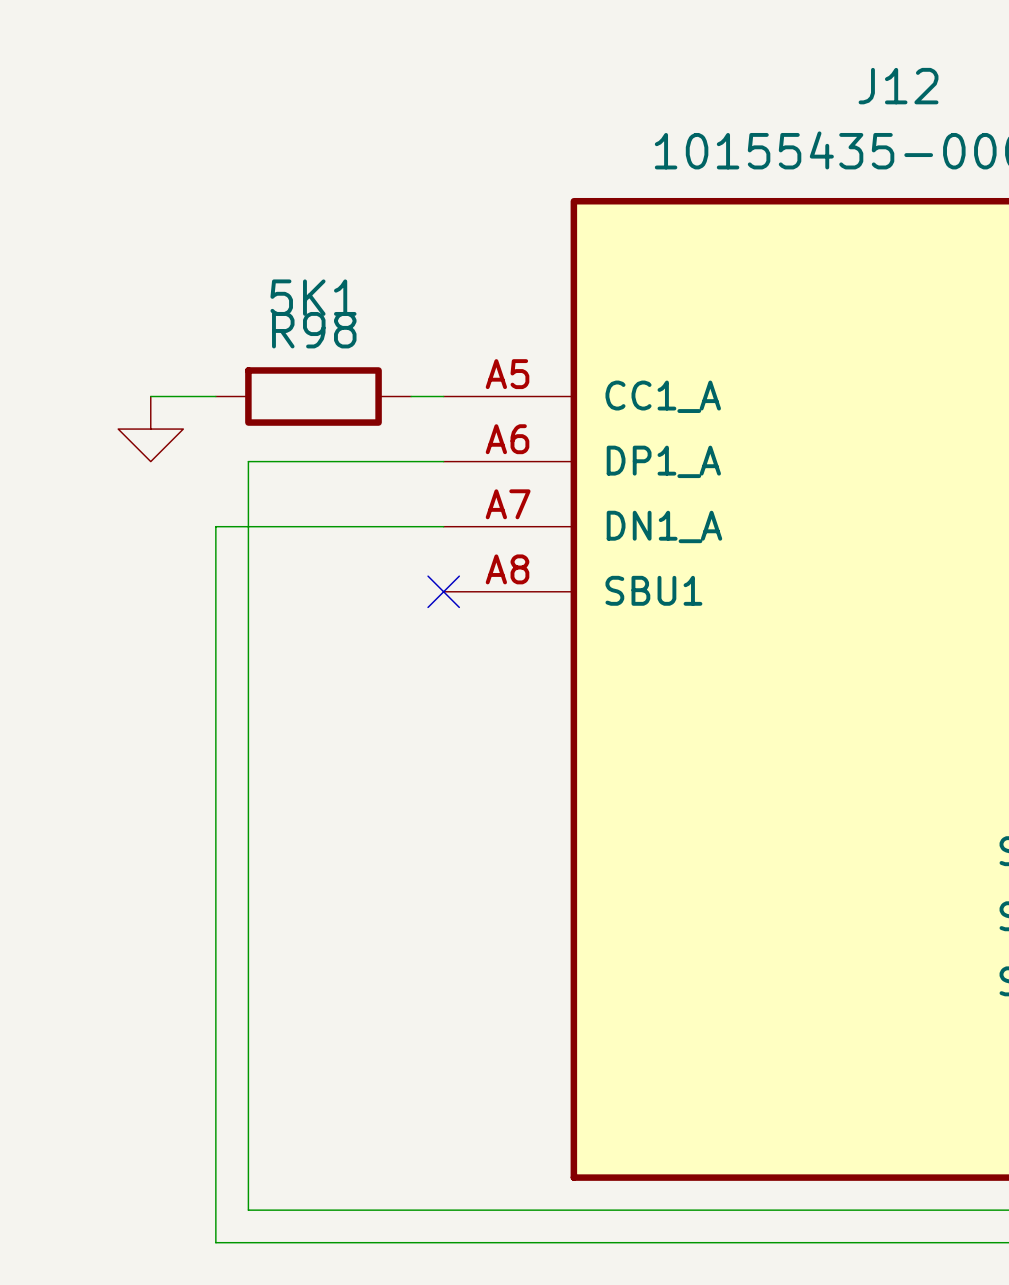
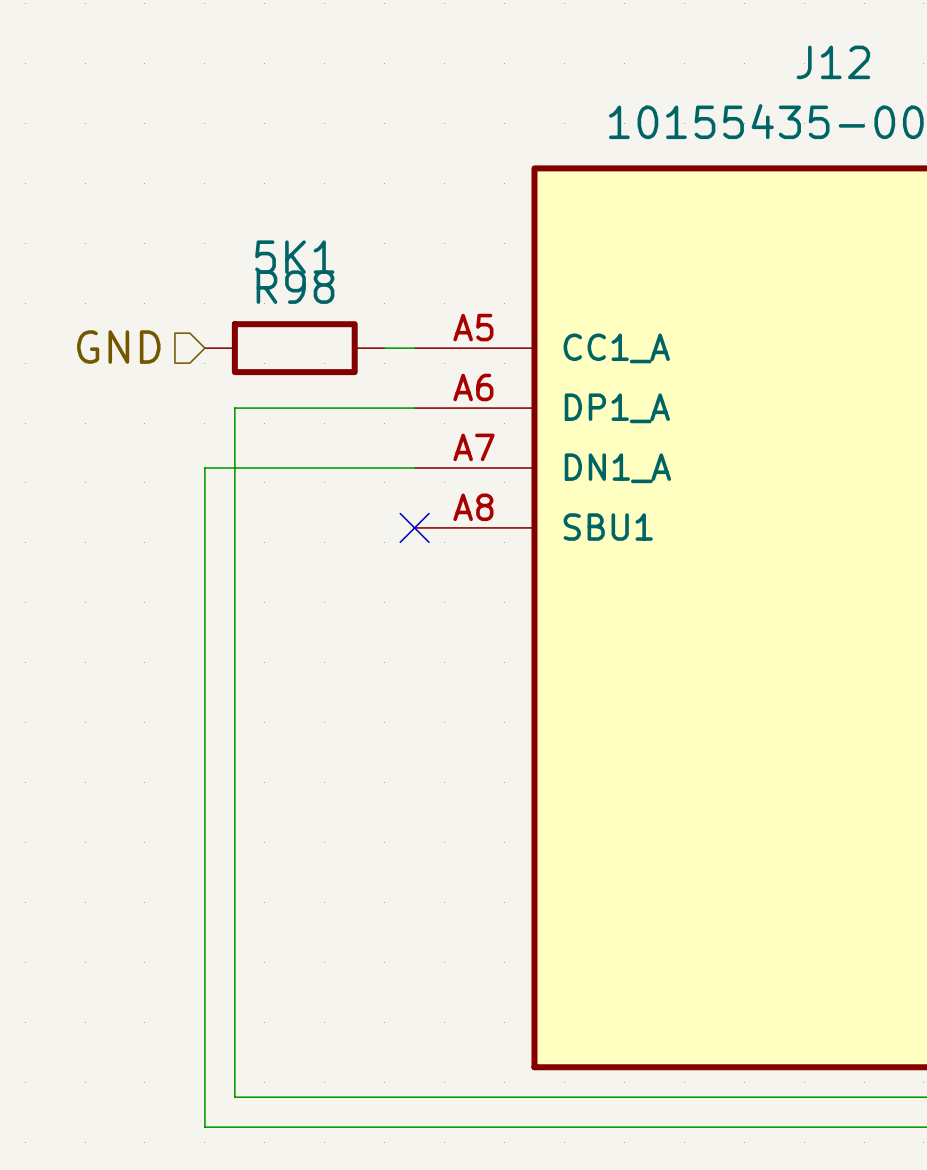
hierarchical label: none -> GND (118, 347)
wire: (150, 396) (215, 396) -> none
power symbol: (150, 429) -> none

